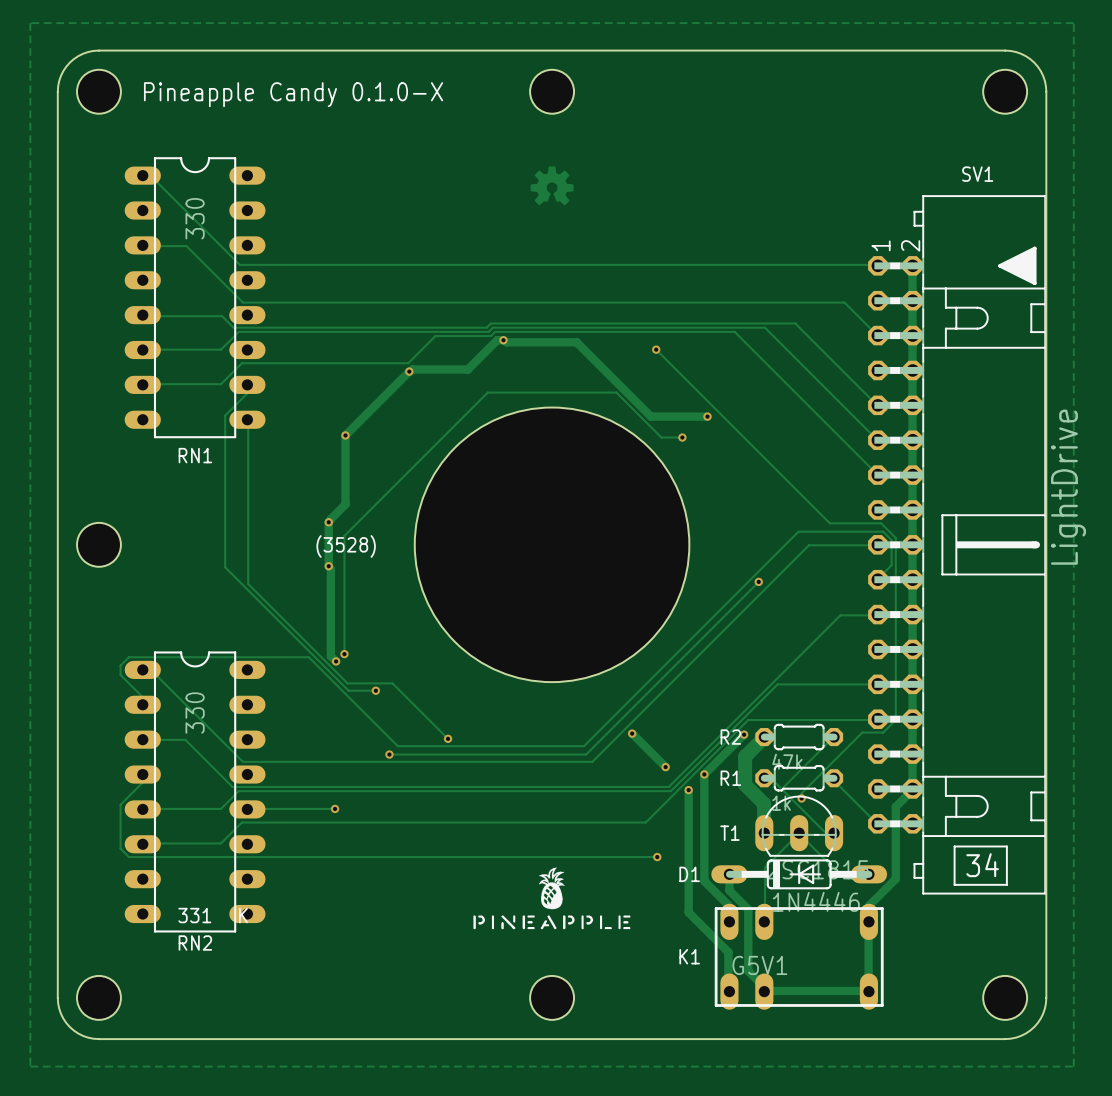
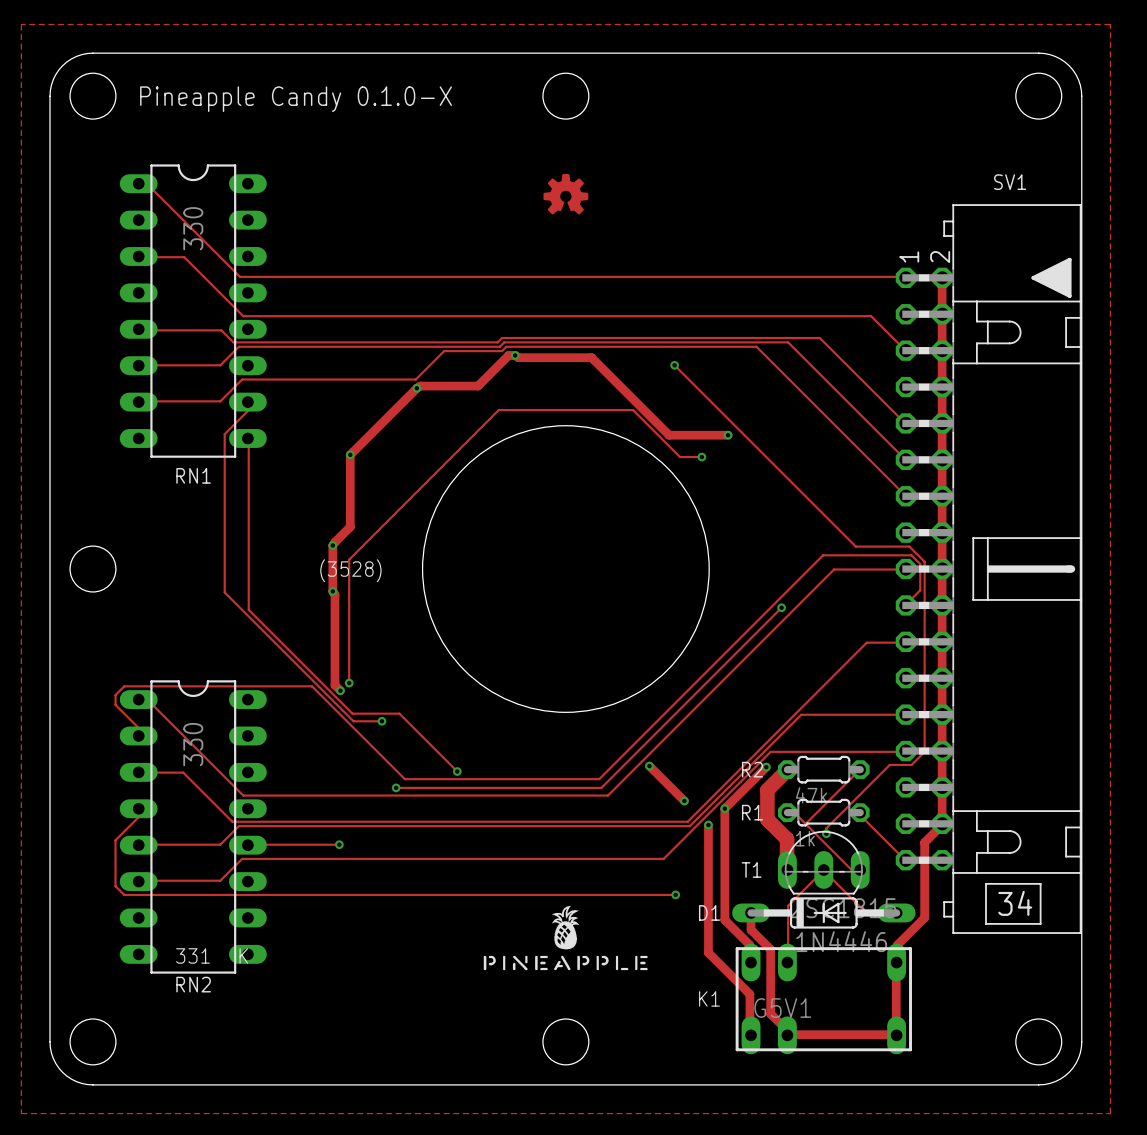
SV1 value: LightDrive (1068, 487) -> none

